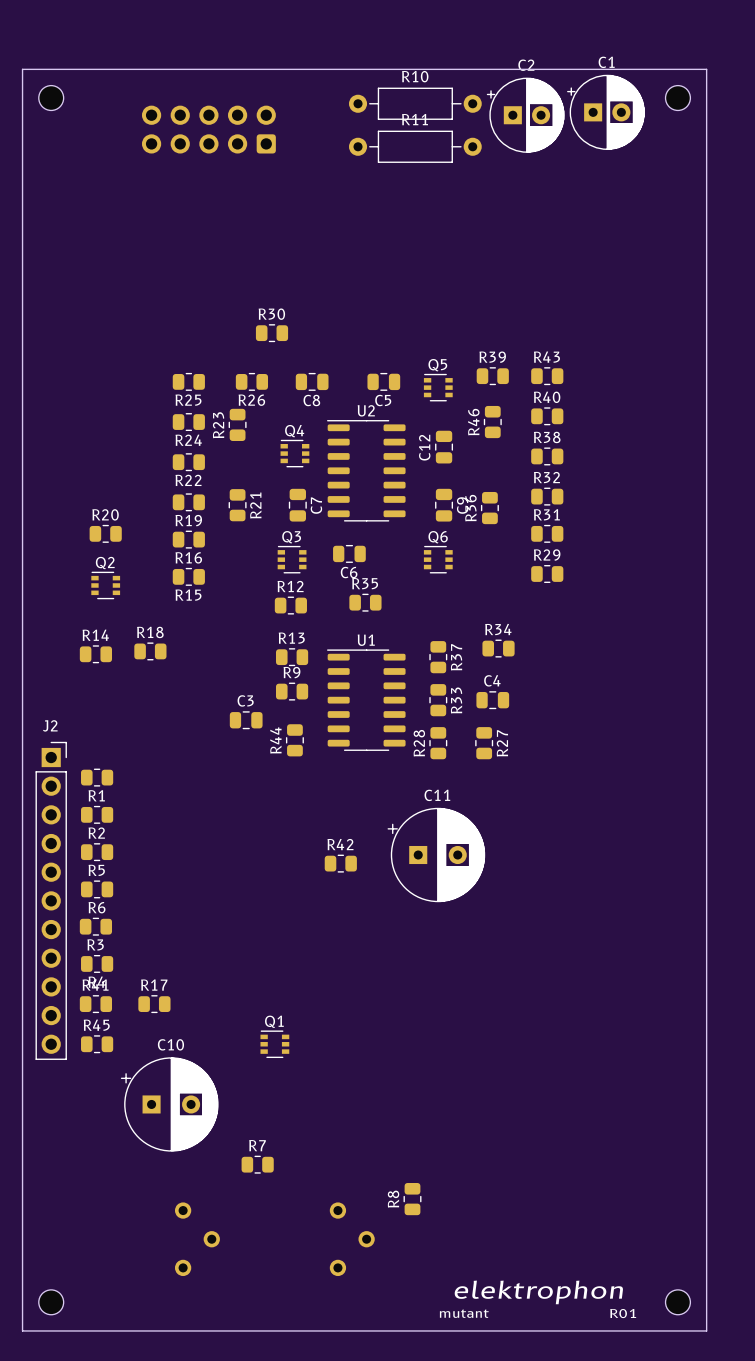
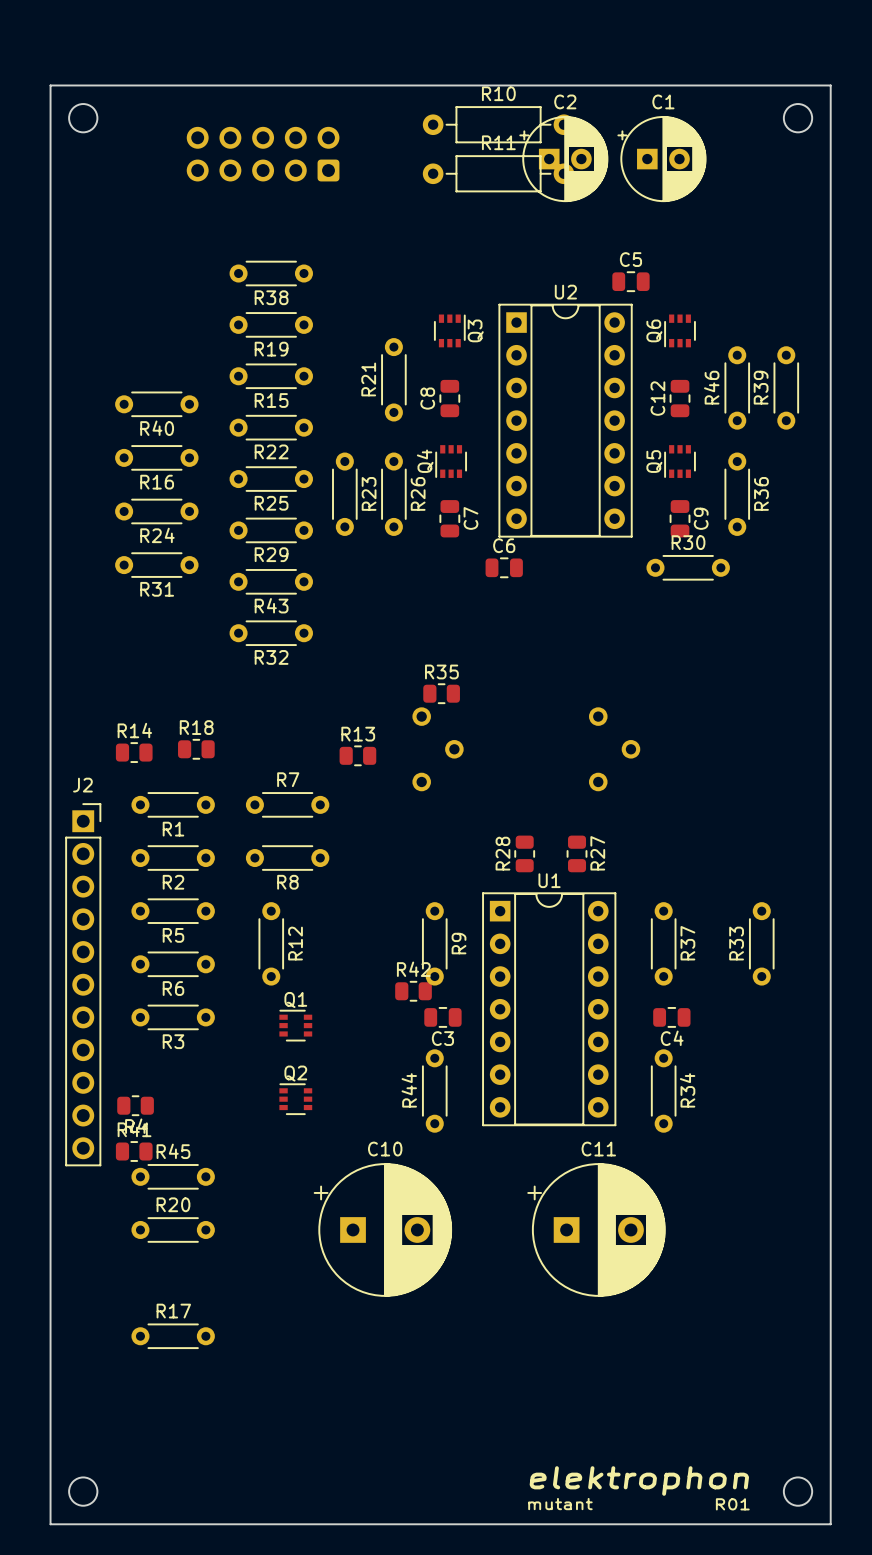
C1 position: (605, 112) -> (661, 159)
C2 position: (525, 115) -> (563, 159)
R30 footprint: [255, 324, 289, 343] -> [646, 555, 730, 581]
R39 name position: R39 (492, 357) -> R39 (761, 387)
R43 name position: R43 (546, 357) -> R43 (271, 605)
R39 footprint: [476, 367, 509, 386] -> [773, 346, 799, 430]
R43 footprint: [531, 367, 564, 386] -> [229, 569, 313, 595]
R25 footprint: [172, 372, 205, 391] -> [229, 466, 313, 492]
R26 footprint: [235, 372, 269, 391] -> [381, 452, 407, 536]
C8 rotation: 0° (312, 381) -> 90° clockwise (449, 398)
C8 position: (312, 381) -> (449, 398)
C5 position: (383, 381) -> (630, 281)
Q5 rotation: 0° (438, 387) -> 90° counterclockwise (680, 461)
Q5 position: (438, 387) -> (680, 461)
R40 name position: R40 (547, 397) -> R40 (157, 428)
R26 name position: R26 (251, 400) -> R26 (418, 493)
C5 name position: C5 (383, 400) -> C5 (630, 259)
R46 footprint: [483, 405, 502, 439] -> [724, 346, 750, 430]
R40 footprint: [531, 407, 564, 426] -> [115, 391, 199, 417]
R23 footprint: [228, 408, 247, 441] -> [332, 452, 358, 536]
U2 name position: U2 (366, 410) -> U2 (565, 292)
R24 footprint: [172, 413, 205, 432] -> [115, 498, 199, 525]
U2 footprint: [327, 420, 406, 522] -> [498, 303, 633, 538]
R23 name position: R23 (218, 425) -> R23 (369, 493)
R38 name position: R38 (547, 437) -> R38 (271, 297)
C12 position: (444, 447) -> (680, 398)
R38 footprint: [531, 447, 564, 466] -> [229, 260, 313, 287]
R22 footprint: [172, 453, 205, 472] -> [229, 415, 313, 441]
Q4 rotation: 0° (294, 453) -> 90° counterclockwise (451, 461)
Q4 position: (294, 453) -> (451, 461)
R32 name position: R32 (546, 477) -> R32 (271, 657)
R32 footprint: [531, 487, 564, 506] -> [229, 620, 313, 646]
R21 footprint: [228, 489, 247, 522] -> [381, 338, 407, 422]
R36 footprint: [480, 491, 499, 525] -> [724, 452, 750, 536]
R19 footprint: [172, 493, 205, 512] -> [229, 312, 313, 338]
R21 name position: R21 (255, 505) -> R21 (368, 379)
C7 position: (297, 505) -> (449, 518)
C9 position: (444, 505) -> (680, 518)
R36 name position: R36 (470, 508) -> R36 (761, 493)
R31 name position: R31 (546, 514) -> R31 (157, 589)
R20 footprint: [89, 524, 122, 543] -> [131, 1217, 215, 1243]
R31 footprint: [531, 524, 564, 543] -> [115, 552, 199, 578]
R16 footprint: [172, 530, 205, 549] -> [115, 445, 199, 471]
C6 position: (349, 553) -> (504, 567)
R29 name position: R29 (547, 555) -> R29 (271, 554)
Q3 rotation: 0° (292, 559) -> 90° clockwise (449, 330)
Q3 position: (292, 559) -> (449, 330)
Q6 rotation: 0° (438, 559) -> 90° counterclockwise (680, 330)
Q6 position: (438, 559) -> (680, 330)
R29 footprint: [531, 565, 564, 583] -> [229, 517, 313, 544]
R15 footprint: [172, 567, 205, 586] -> [229, 363, 313, 389]
C6 name position: C6 (349, 572) -> C6 (504, 545)
Q2 position: (105, 585) -> (295, 1099)
R12 name position: R12 (290, 586) -> R12 (295, 943)
R12 footprint: [274, 596, 307, 615] -> [258, 902, 284, 986]
R34 name position: R34 (498, 629) -> R34 (687, 1090)
R34 footprint: [482, 639, 515, 658] -> [651, 1049, 677, 1133]
U1 name position: U1 (366, 640) -> U1 (549, 880)
R37 footprint: [429, 641, 448, 674] -> [651, 902, 677, 986]
U1 footprint: [327, 649, 406, 751] -> [482, 892, 617, 1127]
part: none -> (438, 749)
part: none -> (614, 749)
R9 name position: R9 (291, 672) -> R9 (459, 943)
C4 name position: C4 (492, 680) -> C4 (672, 1038)
R9 footprint: [275, 682, 309, 701] -> [422, 902, 448, 986]
R33 footprint: [429, 684, 448, 717] -> [749, 902, 775, 986]
C3 name position: C3 (245, 700) -> C3 (442, 1038)
R33 name position: R33 (456, 700) -> R33 (736, 943)
C4 position: (492, 700) -> (671, 1017)
C3 position: (246, 720) -> (442, 1017)
R44 footprint: [285, 724, 304, 757] -> [422, 1049, 448, 1133]
R1 footprint: [81, 768, 114, 787] -> [131, 792, 215, 818]
R2 footprint: [81, 805, 114, 824] -> [131, 845, 215, 871]
C11 footprint: [387, 807, 486, 903] -> [527, 1163, 666, 1297]
R5 footprint: [81, 843, 114, 862] -> [131, 898, 215, 924]
R6 footprint: [81, 880, 114, 899] -> [131, 951, 215, 977]
J2 position: (51, 900) -> (83, 984)
R3 footprint: [79, 917, 113, 936] -> [131, 1004, 215, 1031]
R17 footprint: [138, 995, 171, 1014] -> [131, 1323, 215, 1349]
R45 footprint: [81, 1035, 114, 1054] -> [131, 1164, 215, 1190]
Q1 position: (274, 1044) -> (295, 1025)
C10 footprint: [120, 1057, 219, 1152] -> [313, 1163, 452, 1297]
R7 footprint: [241, 1155, 274, 1174] -> [245, 792, 330, 818]
R8 footprint: [403, 1183, 422, 1216] -> [245, 845, 330, 871]
R8 name position: R8 (393, 1199) -> R8 (287, 882)
part: (197, 1239) -> none
part: (352, 1239) -> none

